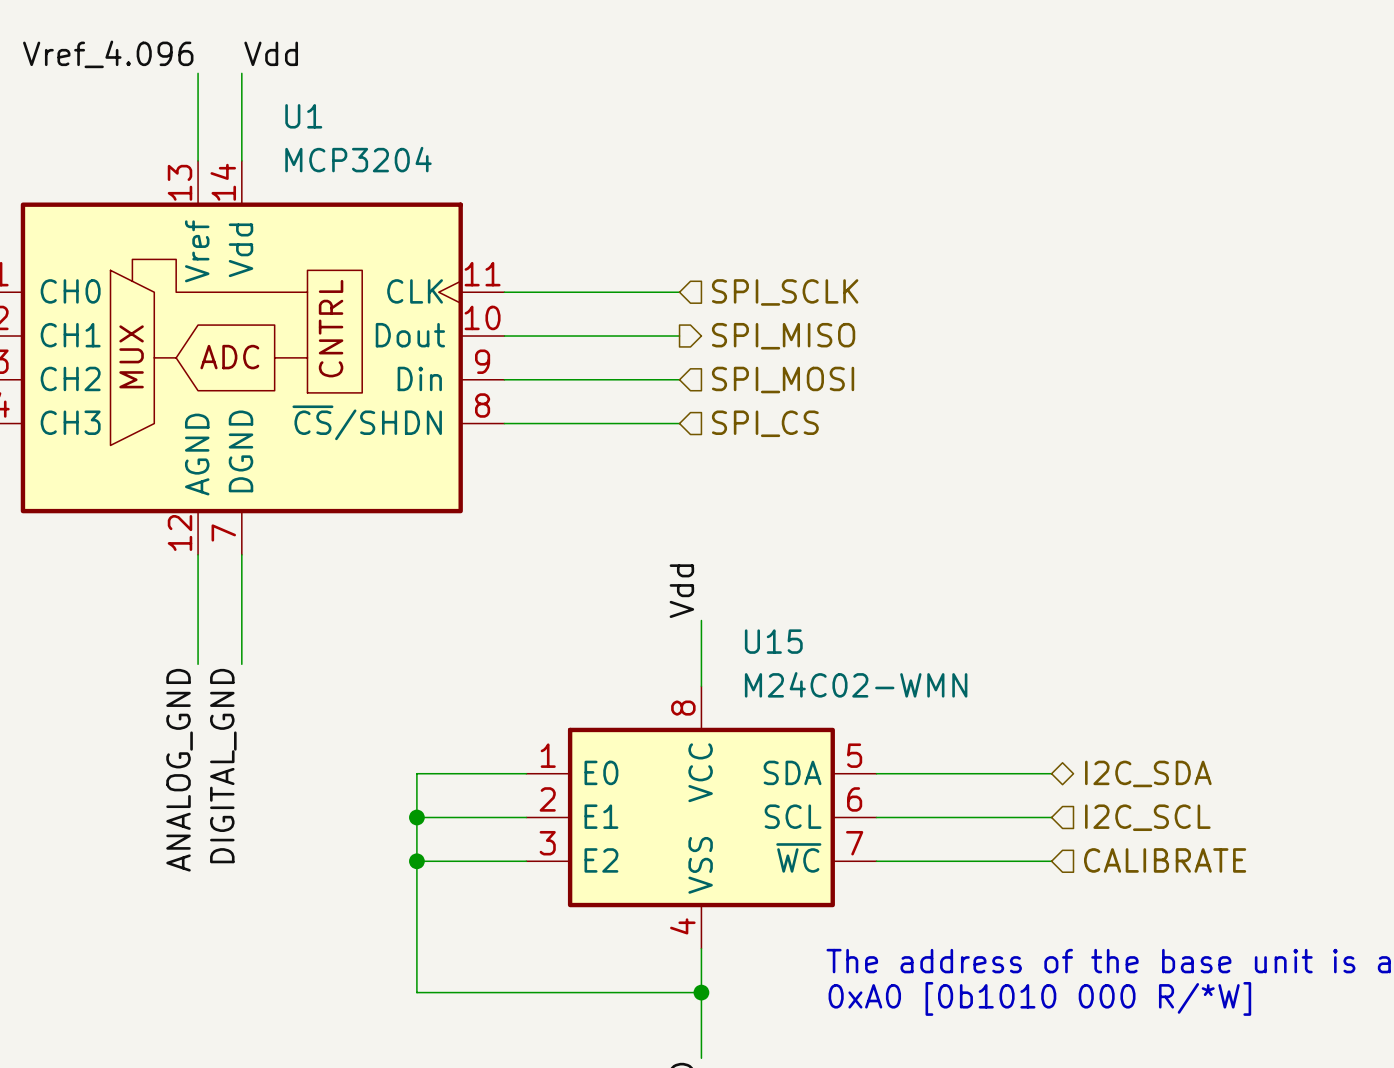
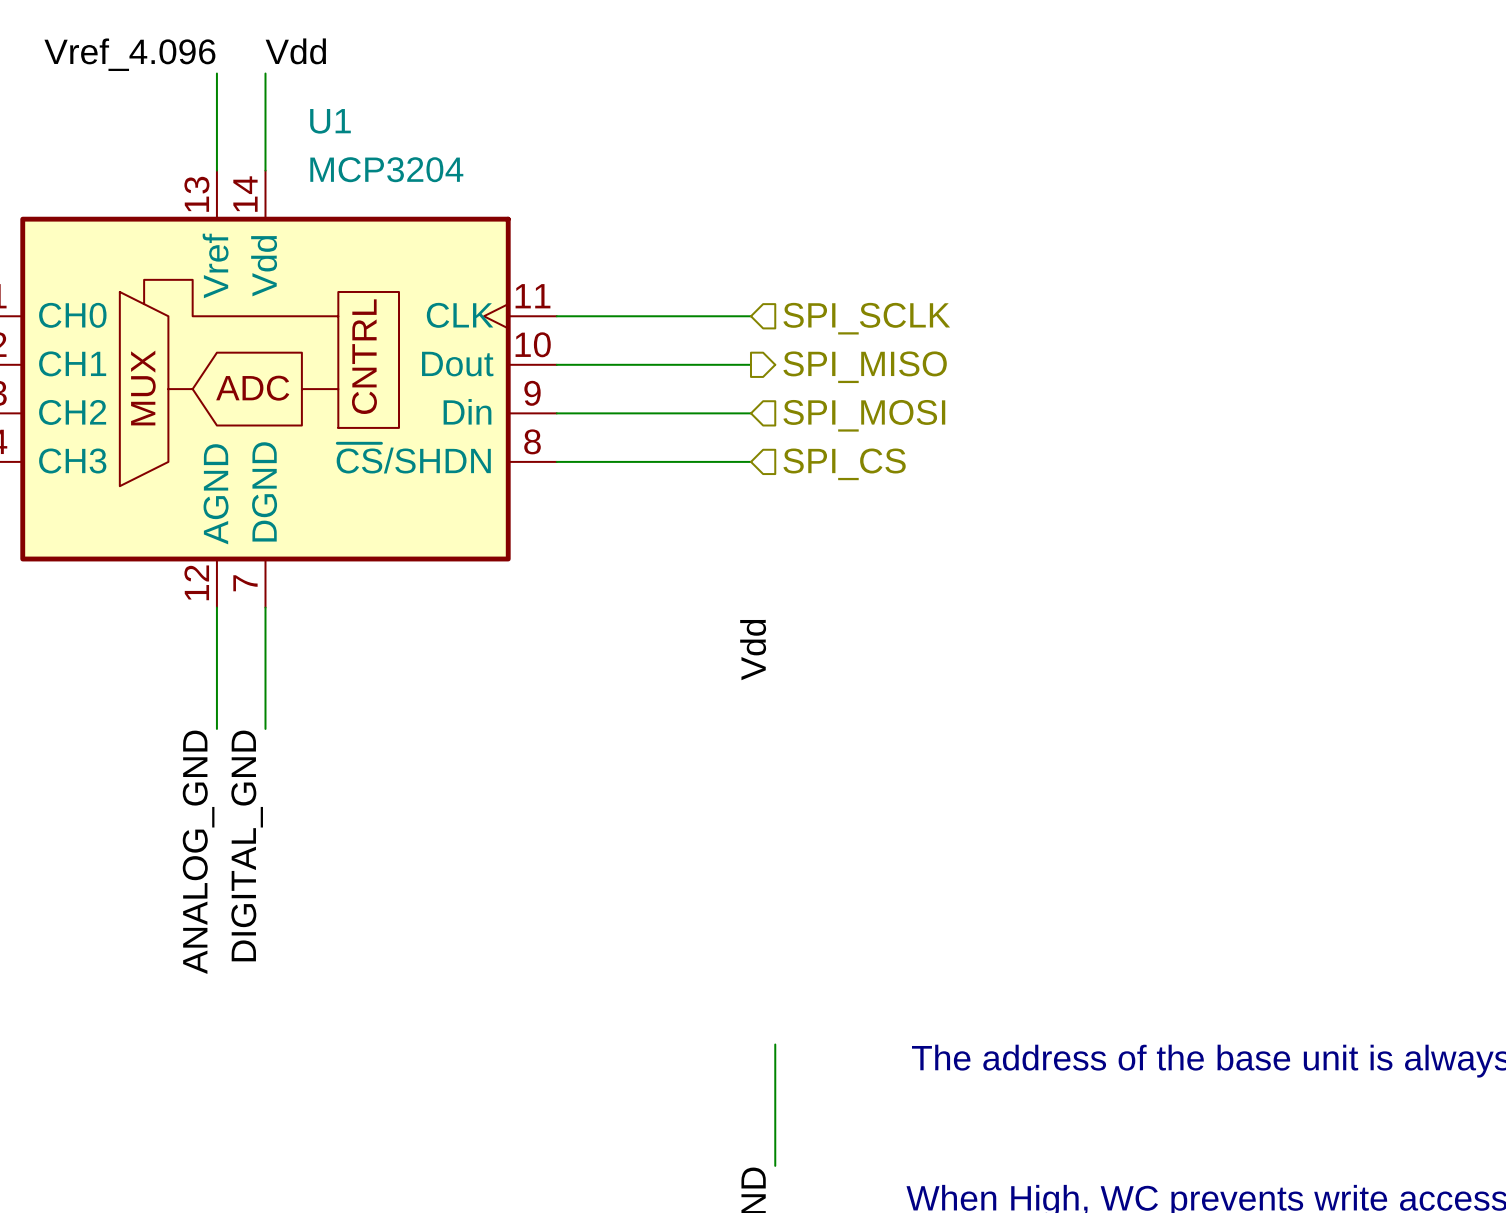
wire: (701, 620) (701, 686) -> none
wire: (526, 773) (416, 773) (416, 992) (701, 992) -> none
wire: (876, 773) (1051, 773) -> none
hierarchical label: I2C_SDA (1148, 773) -> none
wire: (416, 817) (526, 817) -> none
junction: (416, 817) -> none
U15: M24C02-WMN (701, 817) -> none
wire: (876, 817) (1051, 817) -> none
hierarchical label: I2C_SCL (1147, 817) -> none
hierarchical label: CALIBRATE (1165, 860) -> none
wire: (416, 861) (526, 861) -> none
junction: (416, 861) -> none
wire: (876, 861) (1051, 861) -> none
junction: (701, 992) -> none
text: 0xA0 [0b1010 000 R/*W] (1039, 998) -> none

